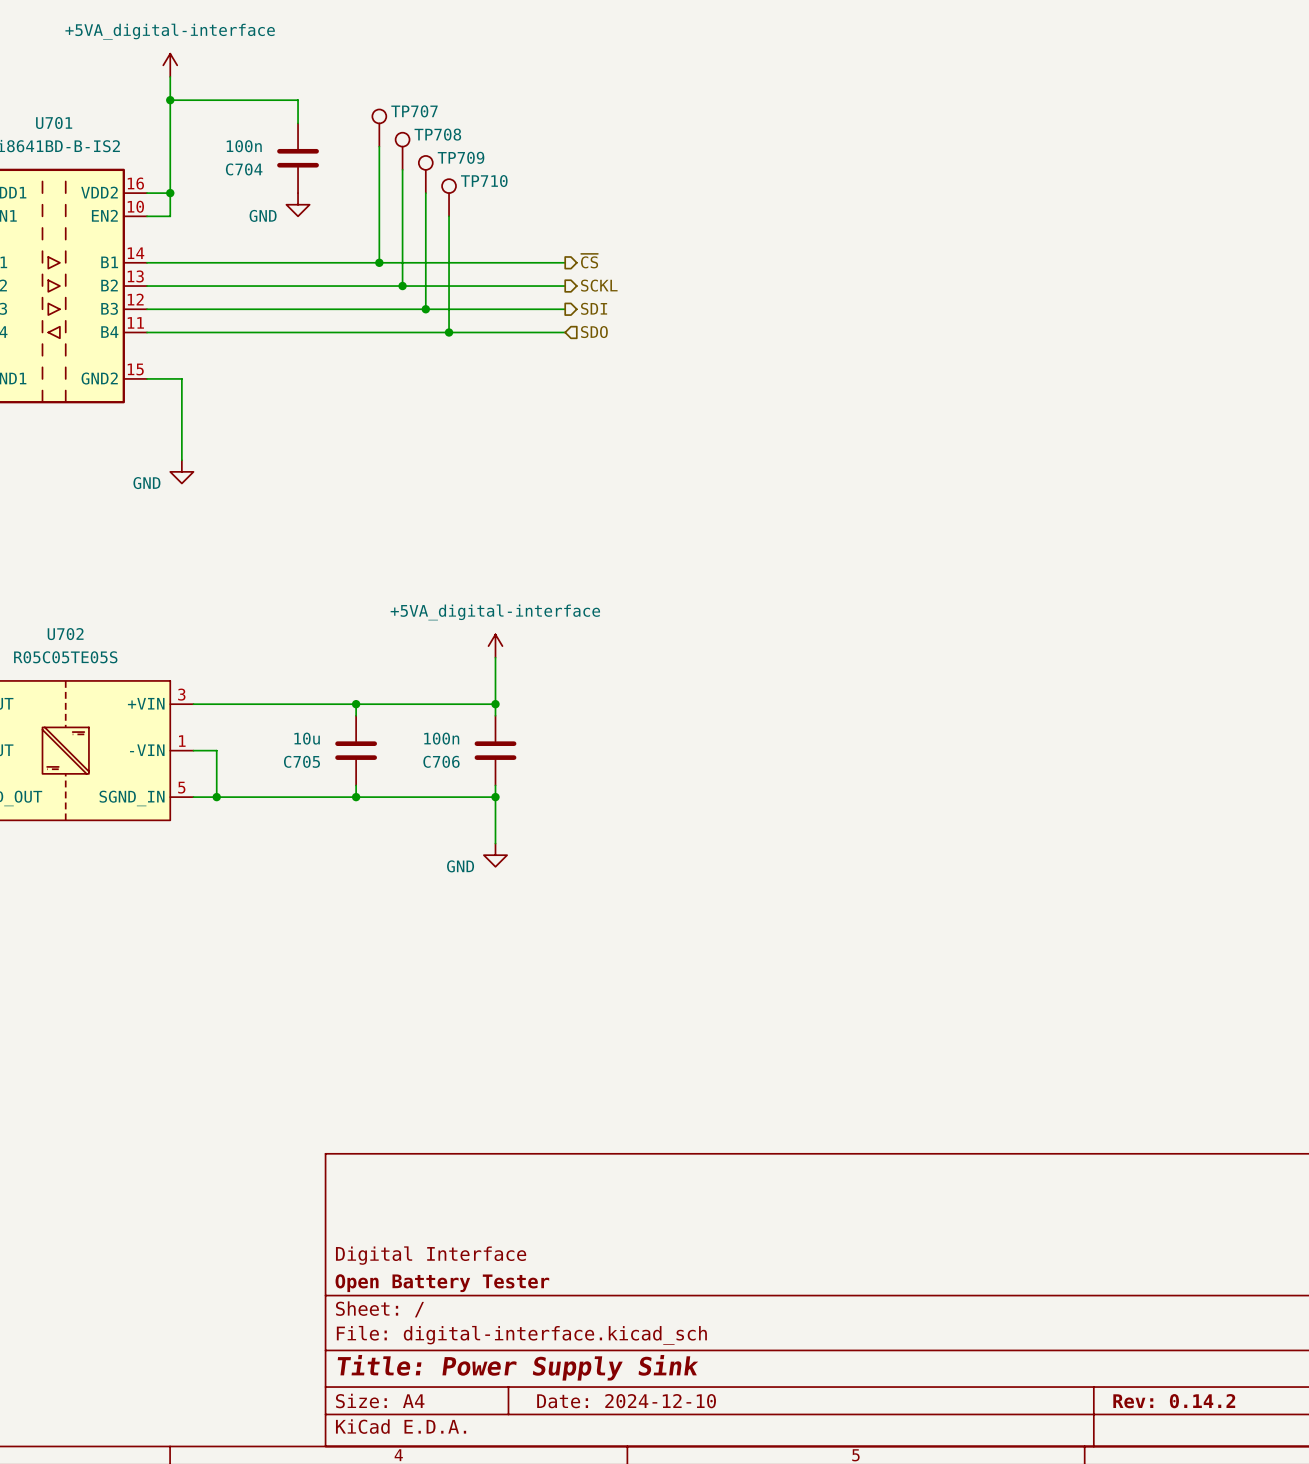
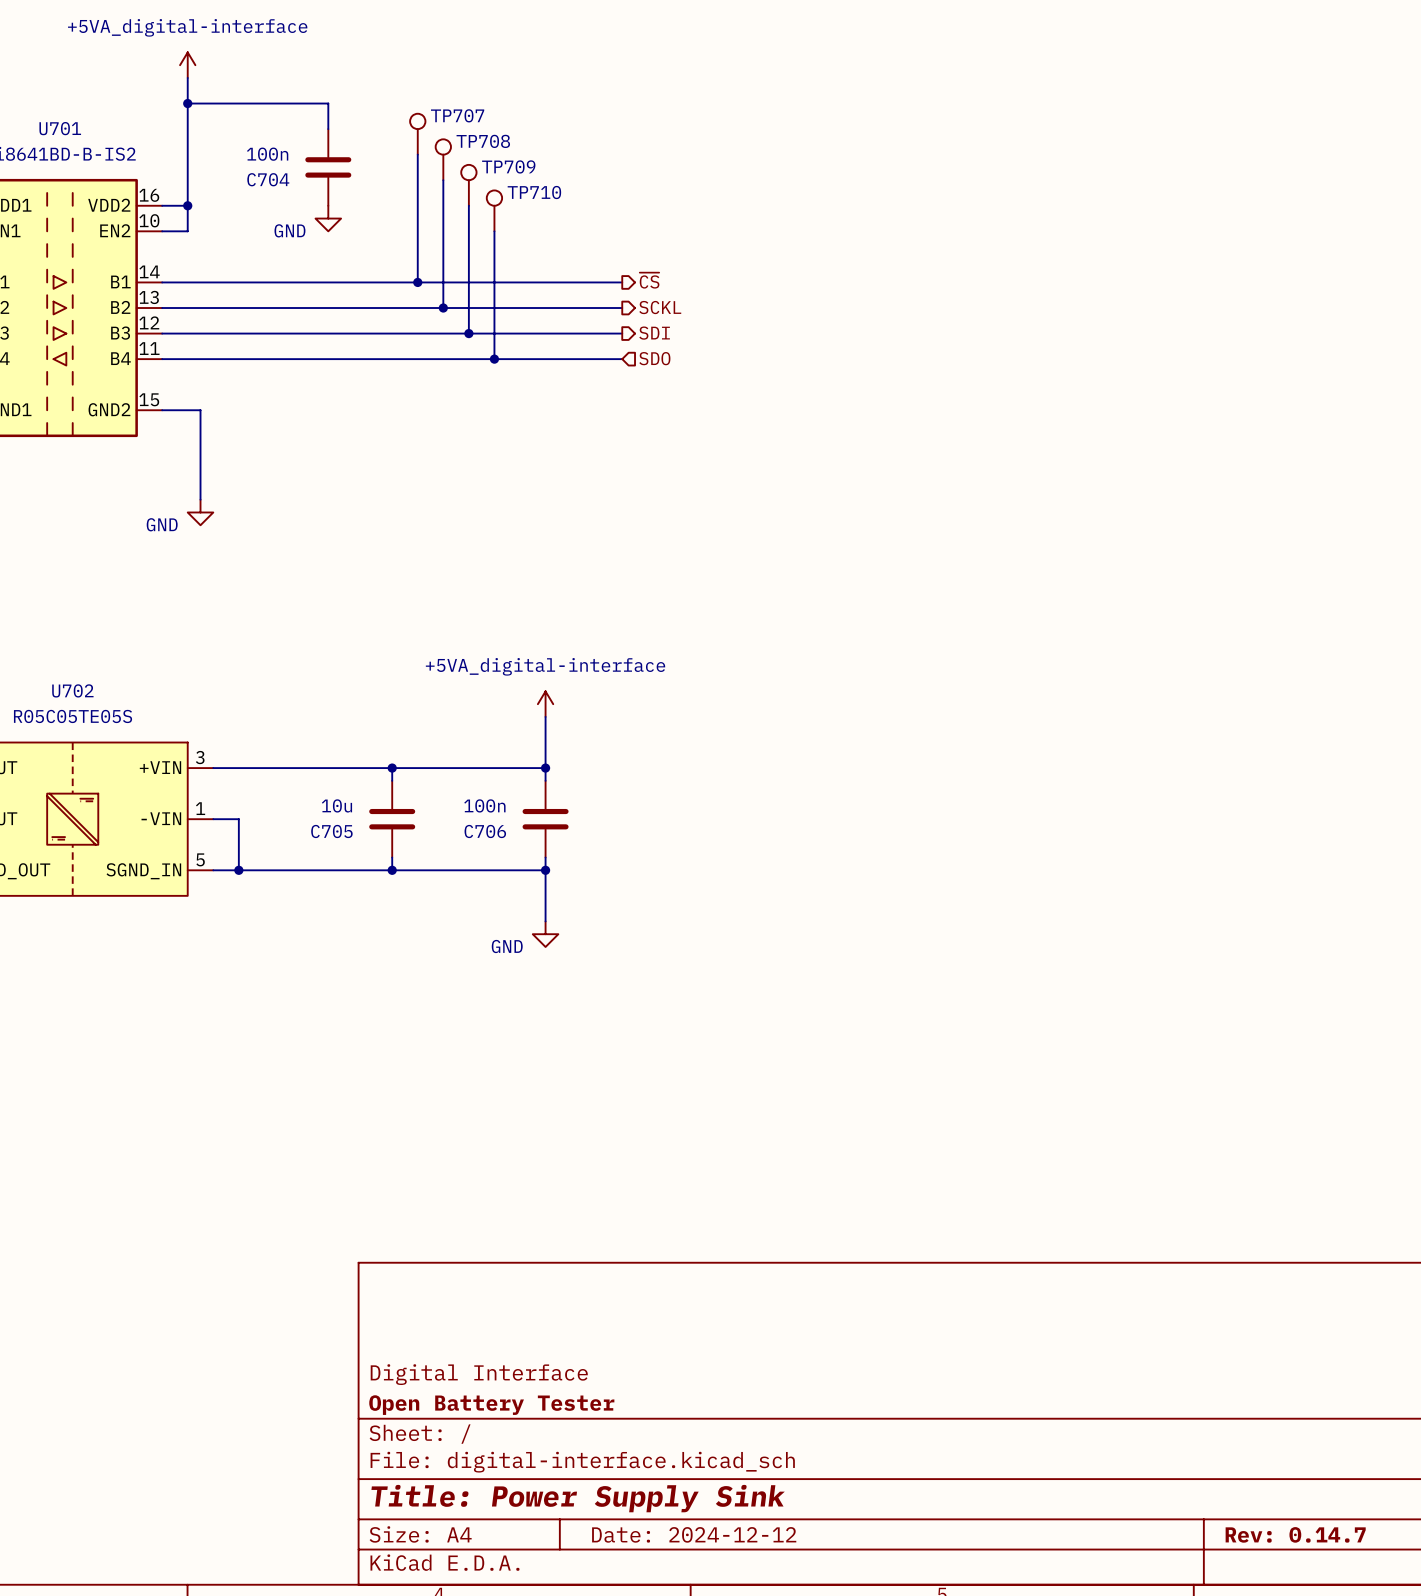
title block: Date: 2024-12-10 (626, 1401) -> Date: 2024-12-12 (694, 1534)
title block: Rev: 0.14.2 (1174, 1401) -> Rev: 0.14.7 (1295, 1534)

